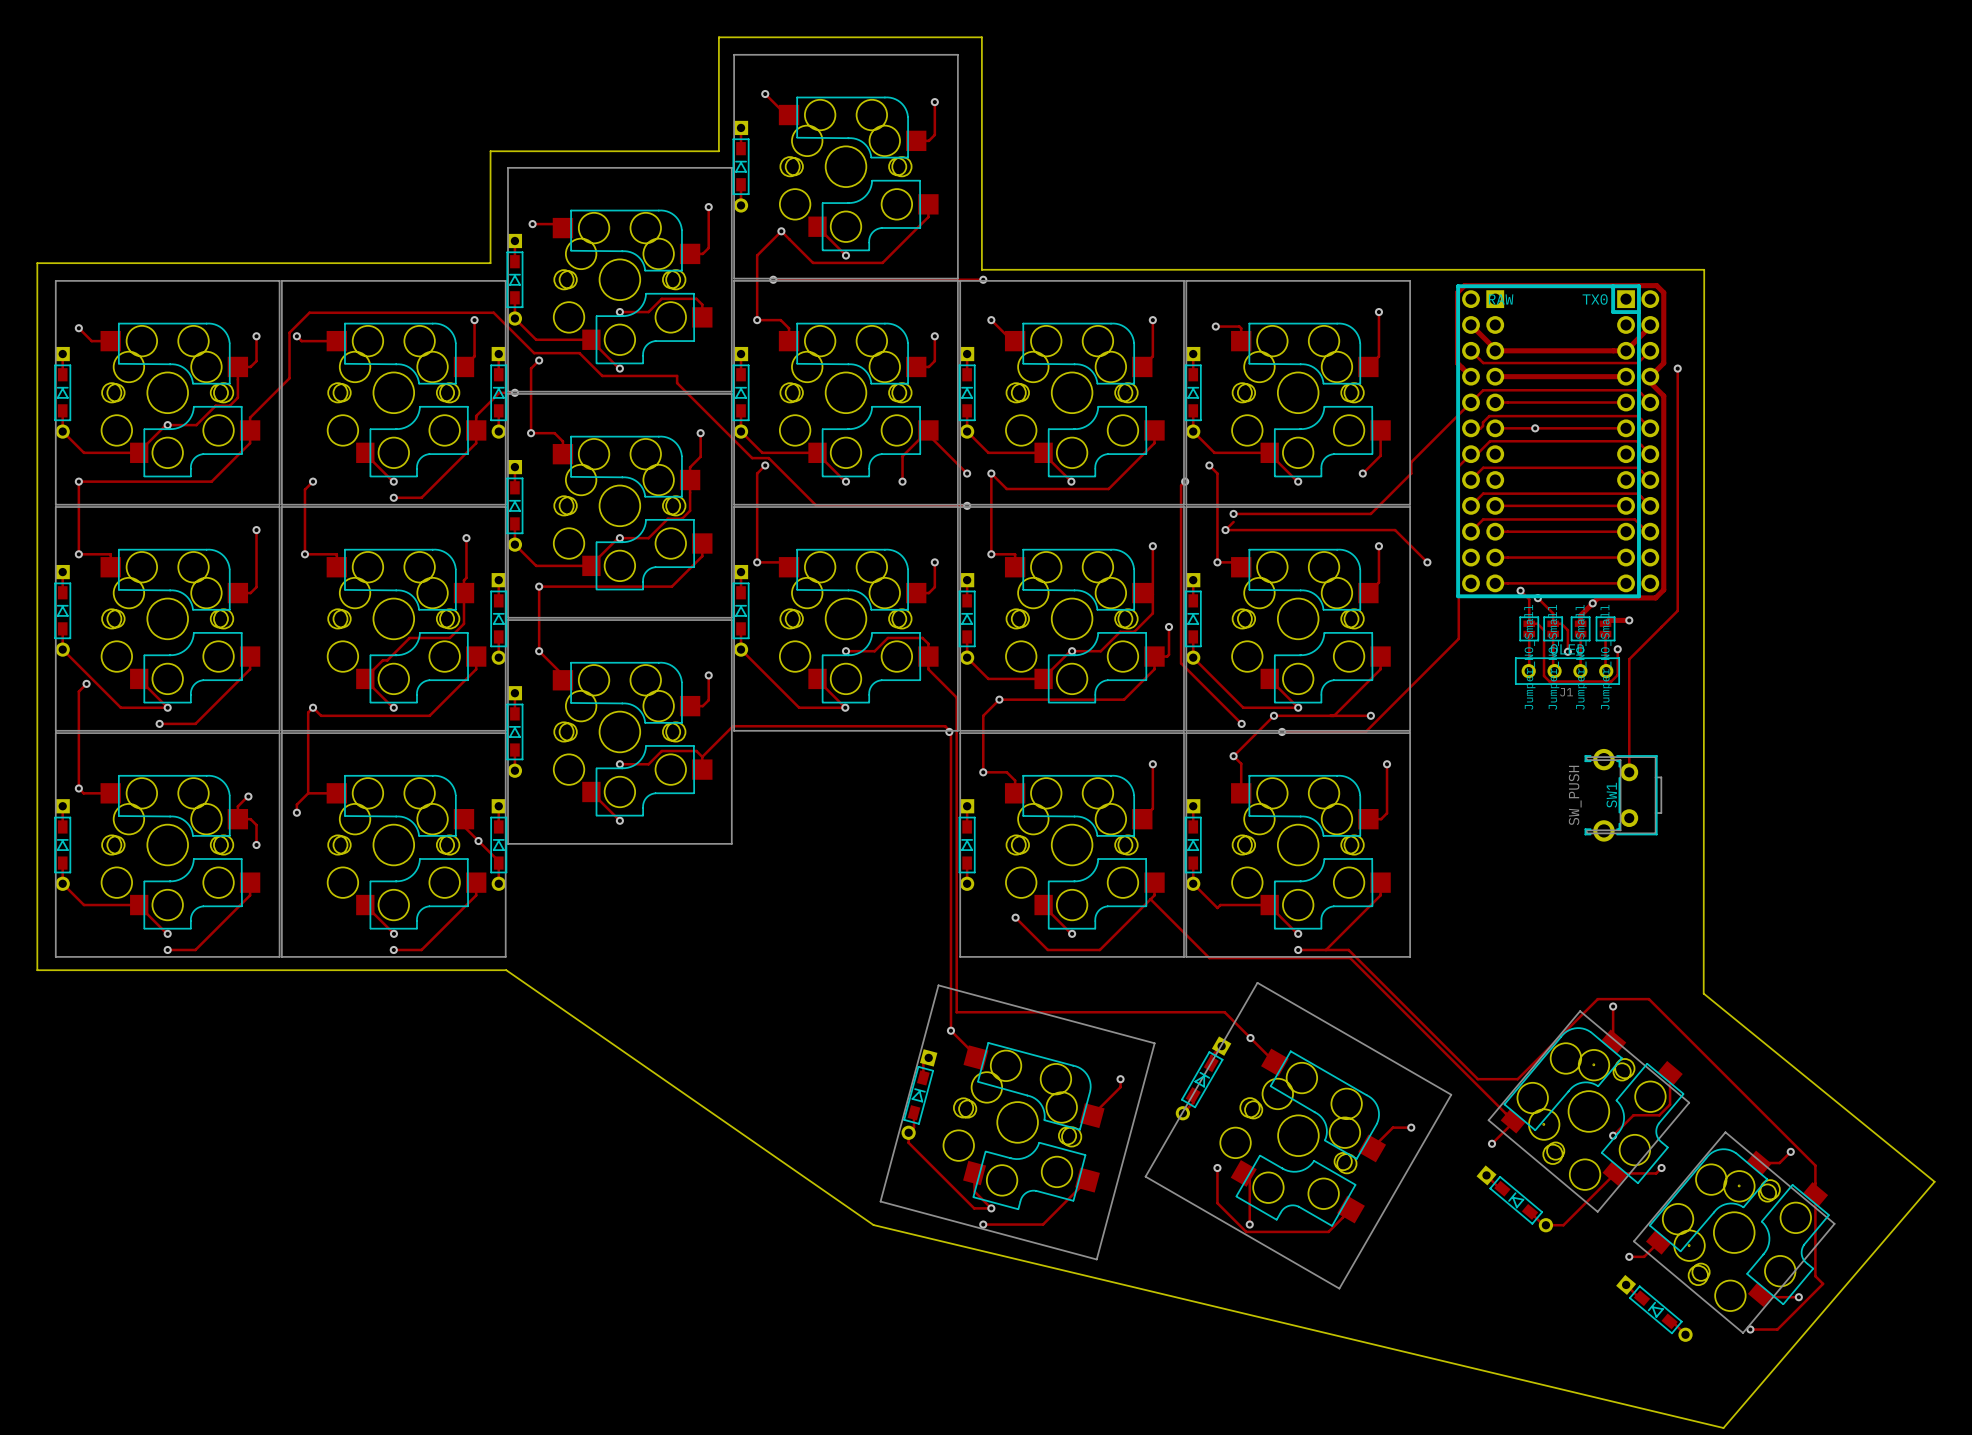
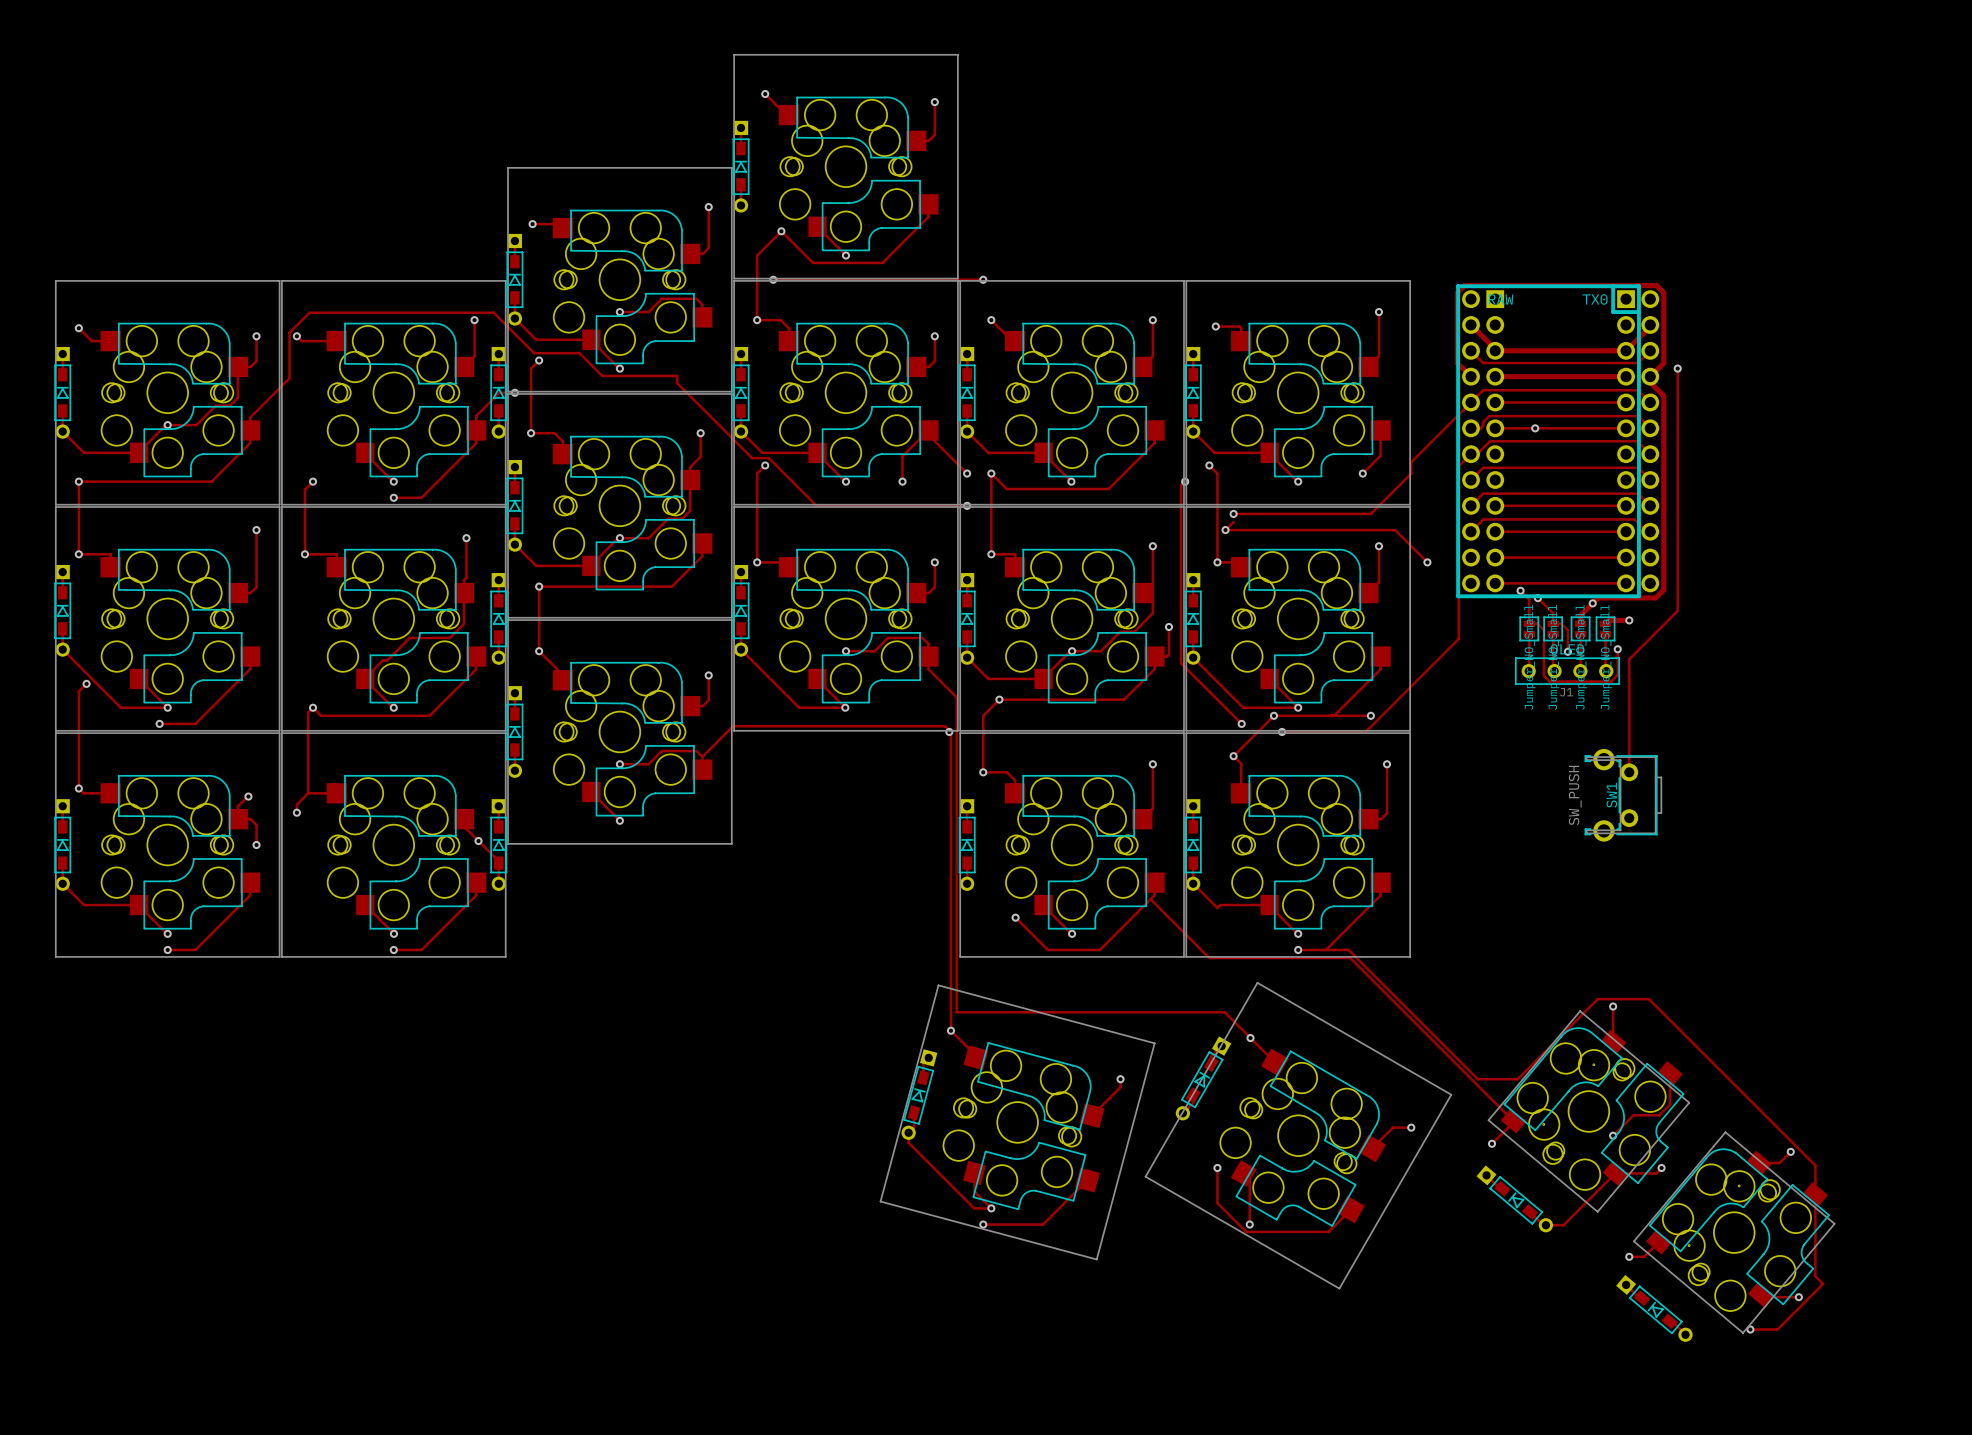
board edge: (718, 37) (718, 151) (490, 151) (490, 263) (37, 263) (37, 970) (506, 970) (873, 1225) (1723, 1428) (1934, 1181) (1703, 993) (1704, 269) (981, 269) (981, 37) (718, 37) -> none

